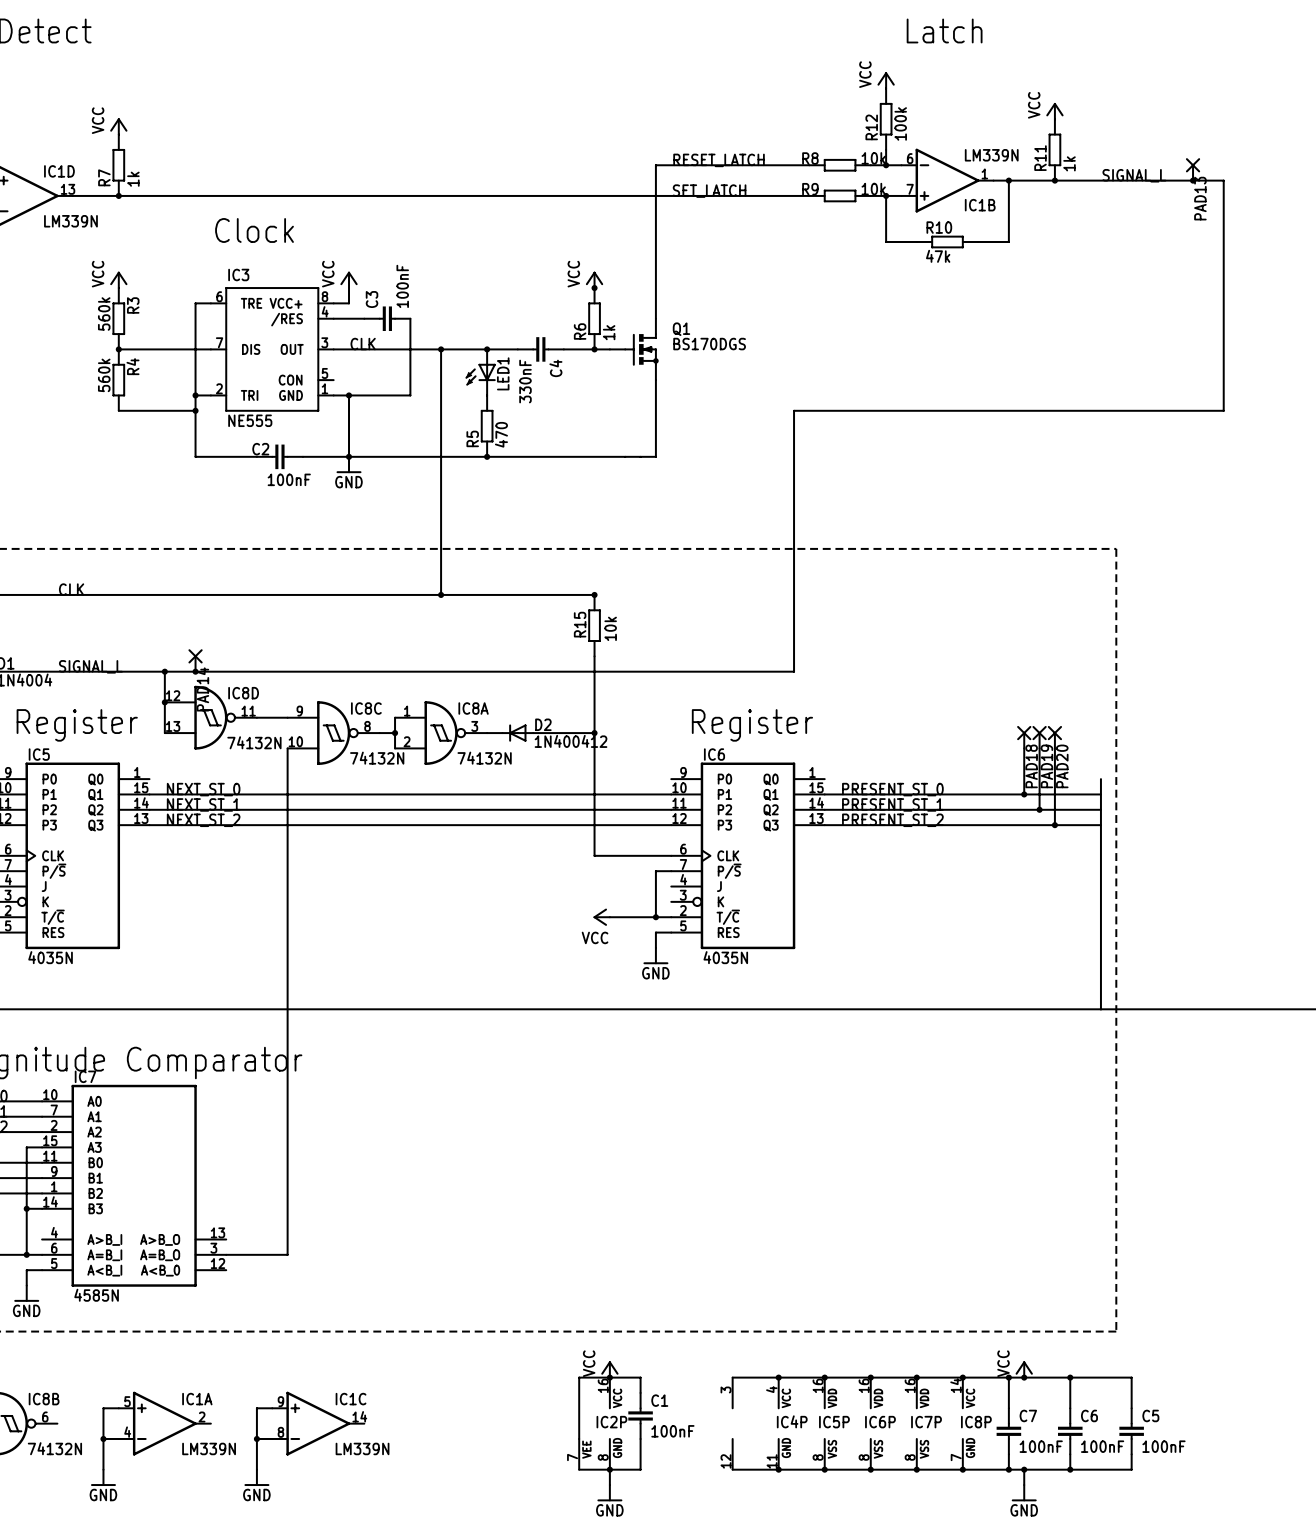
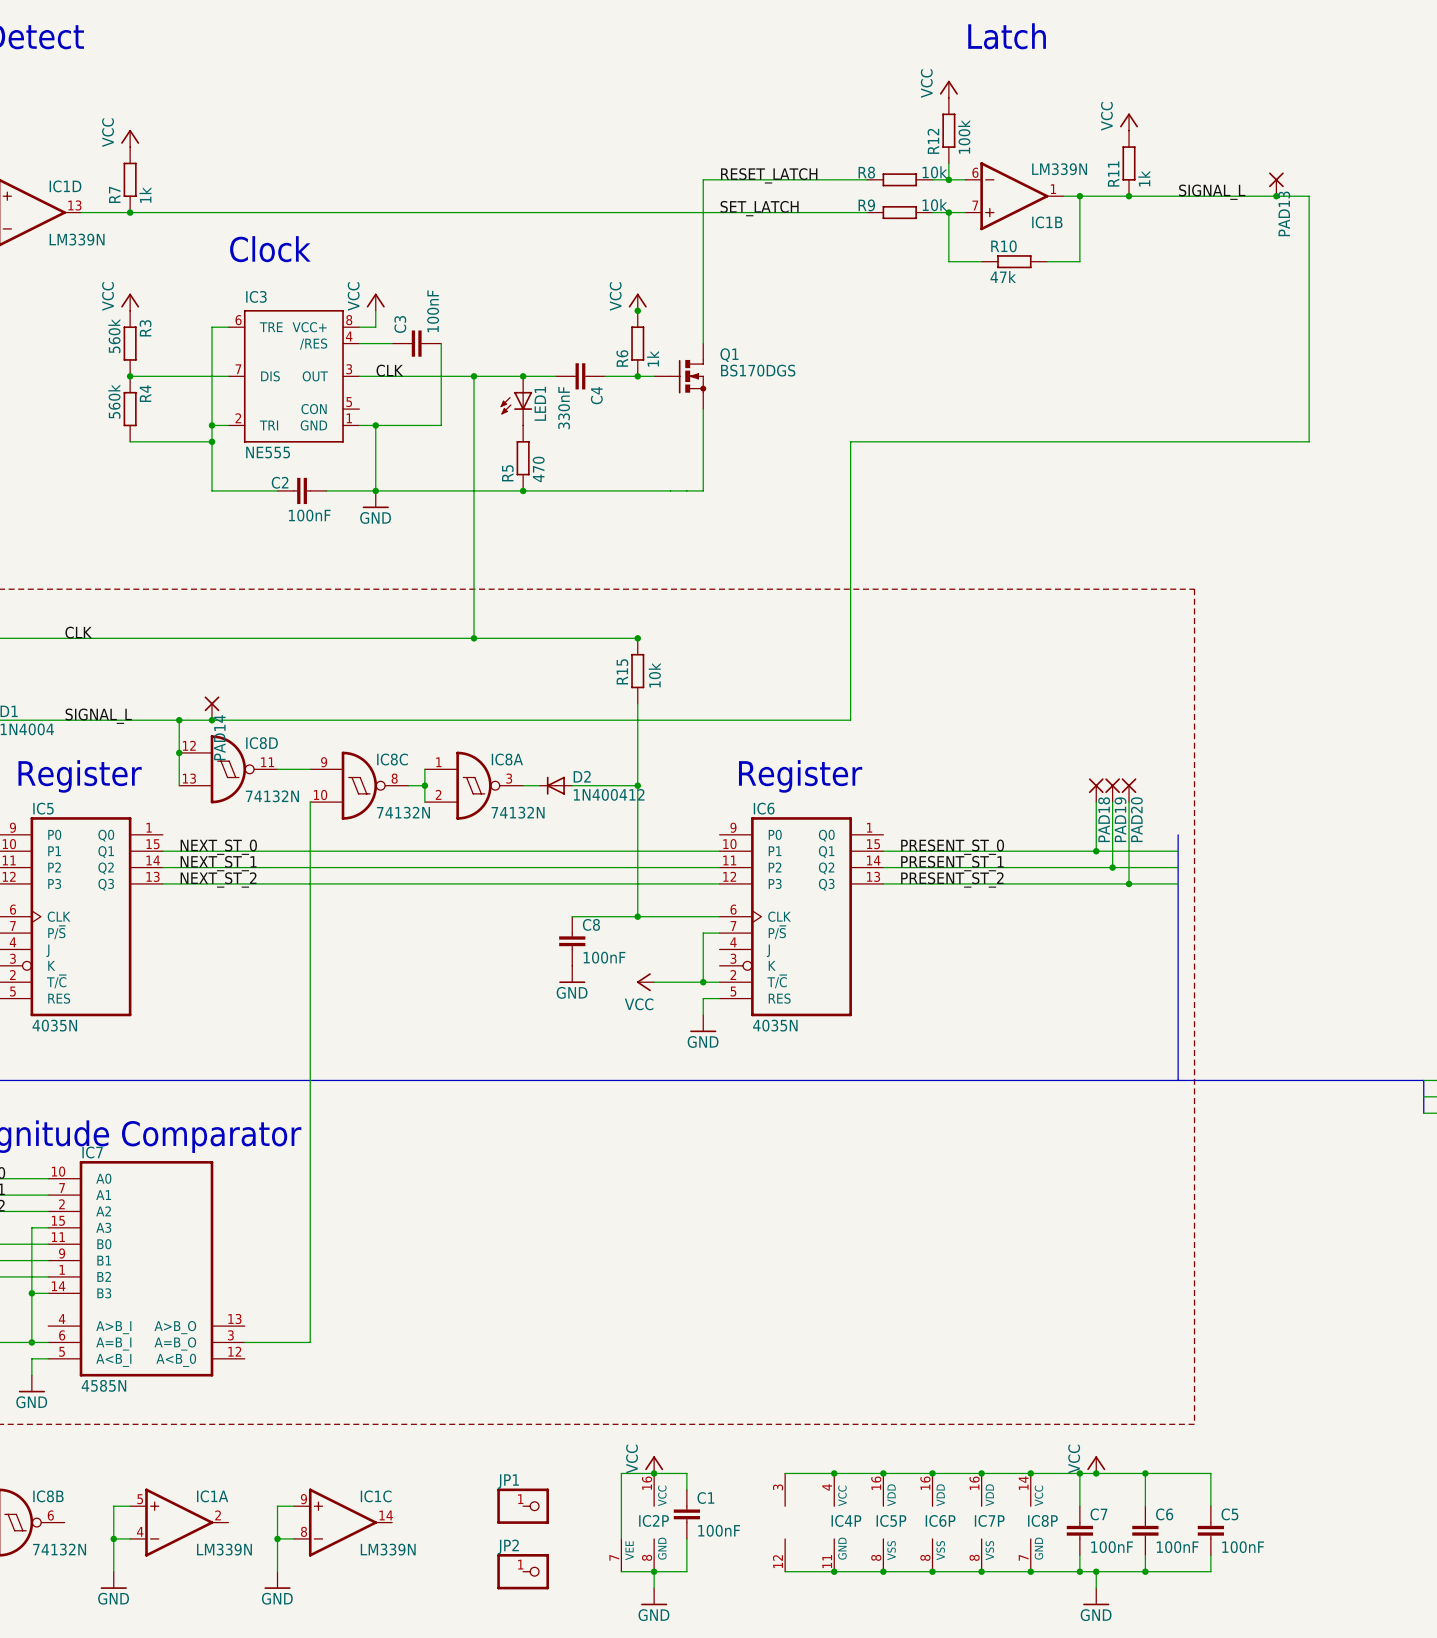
wire: none -> (572, 916) (637, 916)
junction: none -> (637, 916)
C8: none -> 100nF (572, 941)
power symbol: none -> GND (572, 974)
JP1: none -> (523, 1506)
JP2: none -> (523, 1571)

